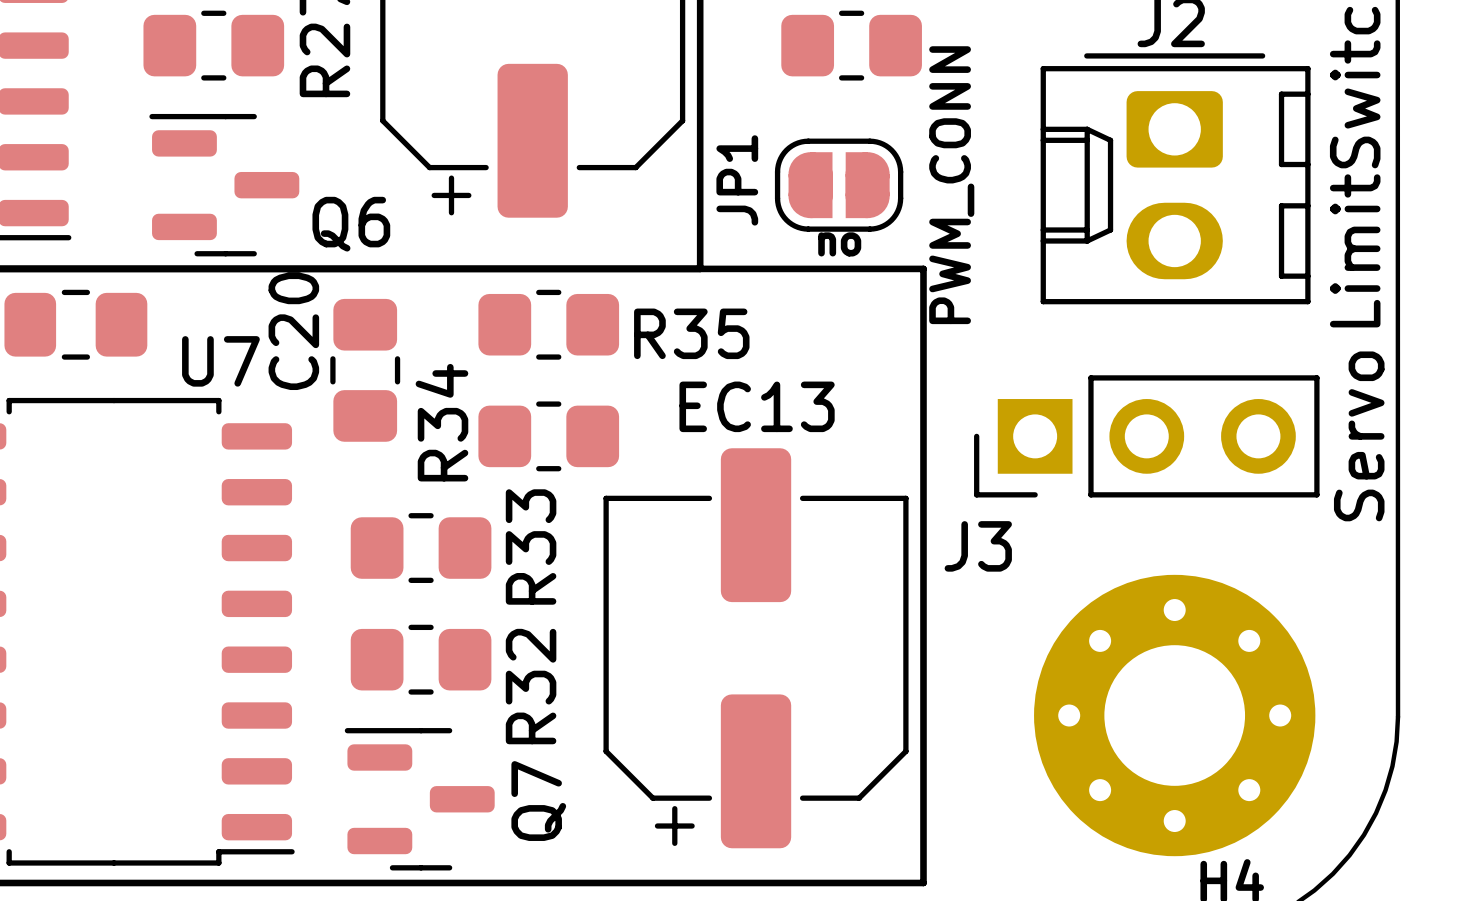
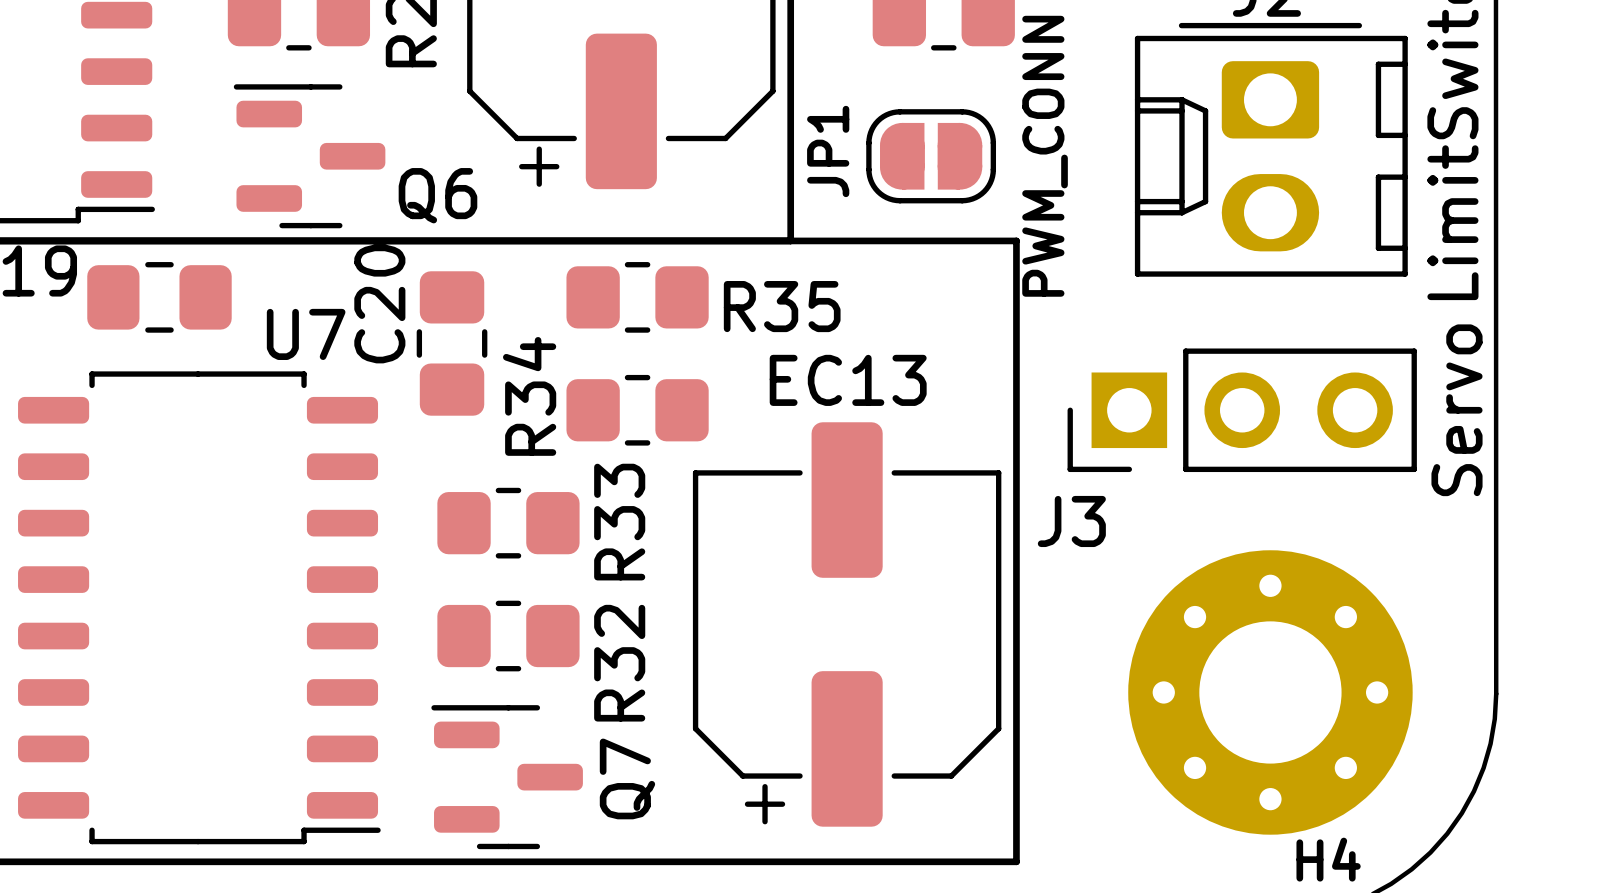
JP1 text: no (839, 244) -> none

